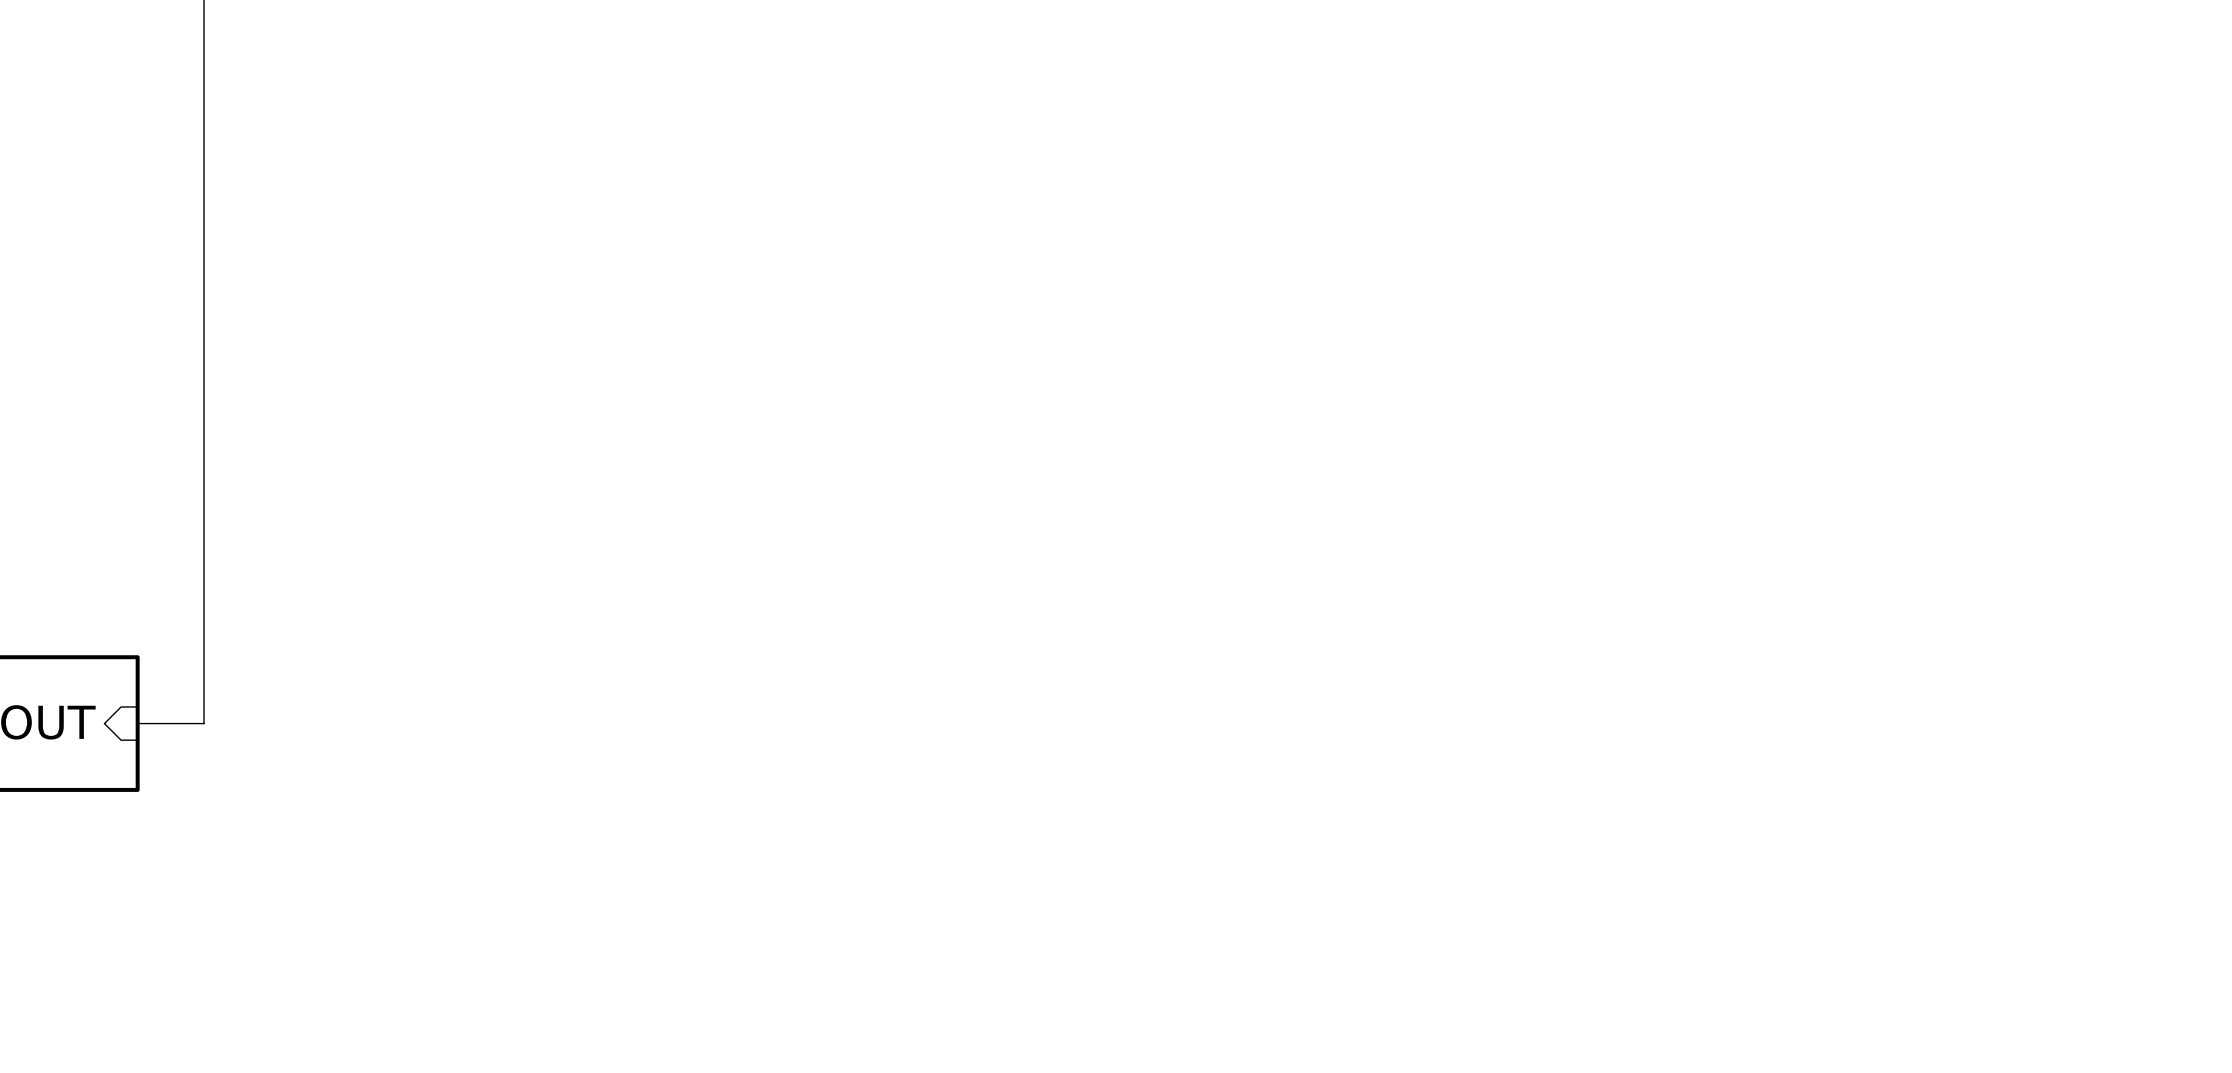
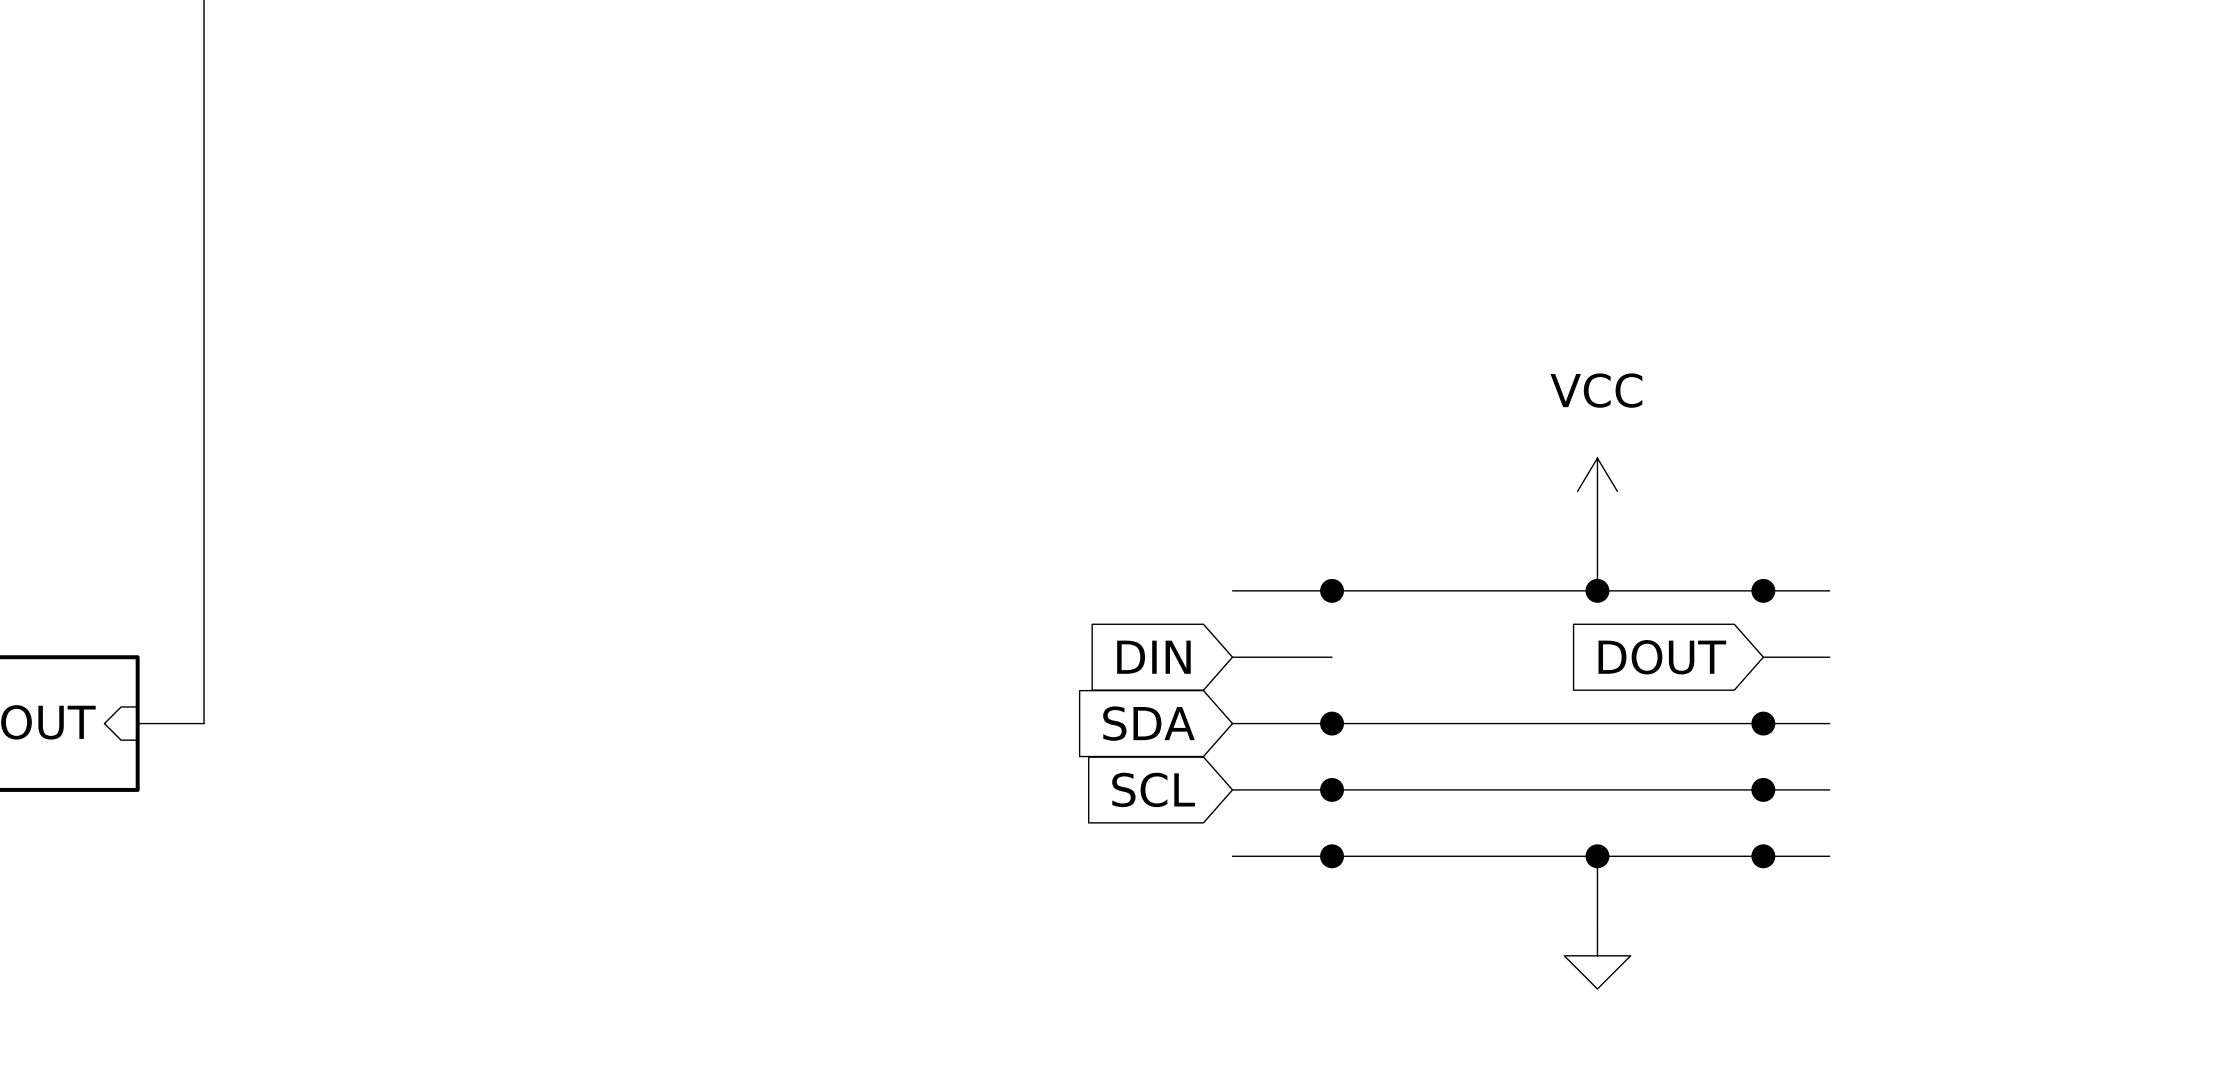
power symbol: none -> VCC (1597, 491)
wire: none -> (1597, 524) (1597, 590)
wire: none -> (1232, 590) (1829, 590)
junction: none -> (1332, 590)
junction: none -> (1597, 590)
junction: none -> (1763, 590)
global label: none -> DIN (1153, 657)
wire: none -> (1232, 657) (1332, 657)
global label: none -> DOUT (1662, 657)
wire: none -> (1763, 657) (1829, 657)
global label: none -> SDA (1148, 723)
wire: none -> (1232, 723) (1829, 723)
junction: none -> (1332, 723)
junction: none -> (1763, 723)
global label: none -> SCL (1153, 789)
wire: none -> (1232, 789) (1829, 789)
junction: none -> (1332, 789)
junction: none -> (1763, 789)
wire: none -> (1232, 856) (1829, 856)
junction: none -> (1332, 856)
wire: none -> (1597, 856) (1597, 922)
junction: none -> (1597, 856)
junction: none -> (1763, 856)
power symbol: none -> (1597, 955)

